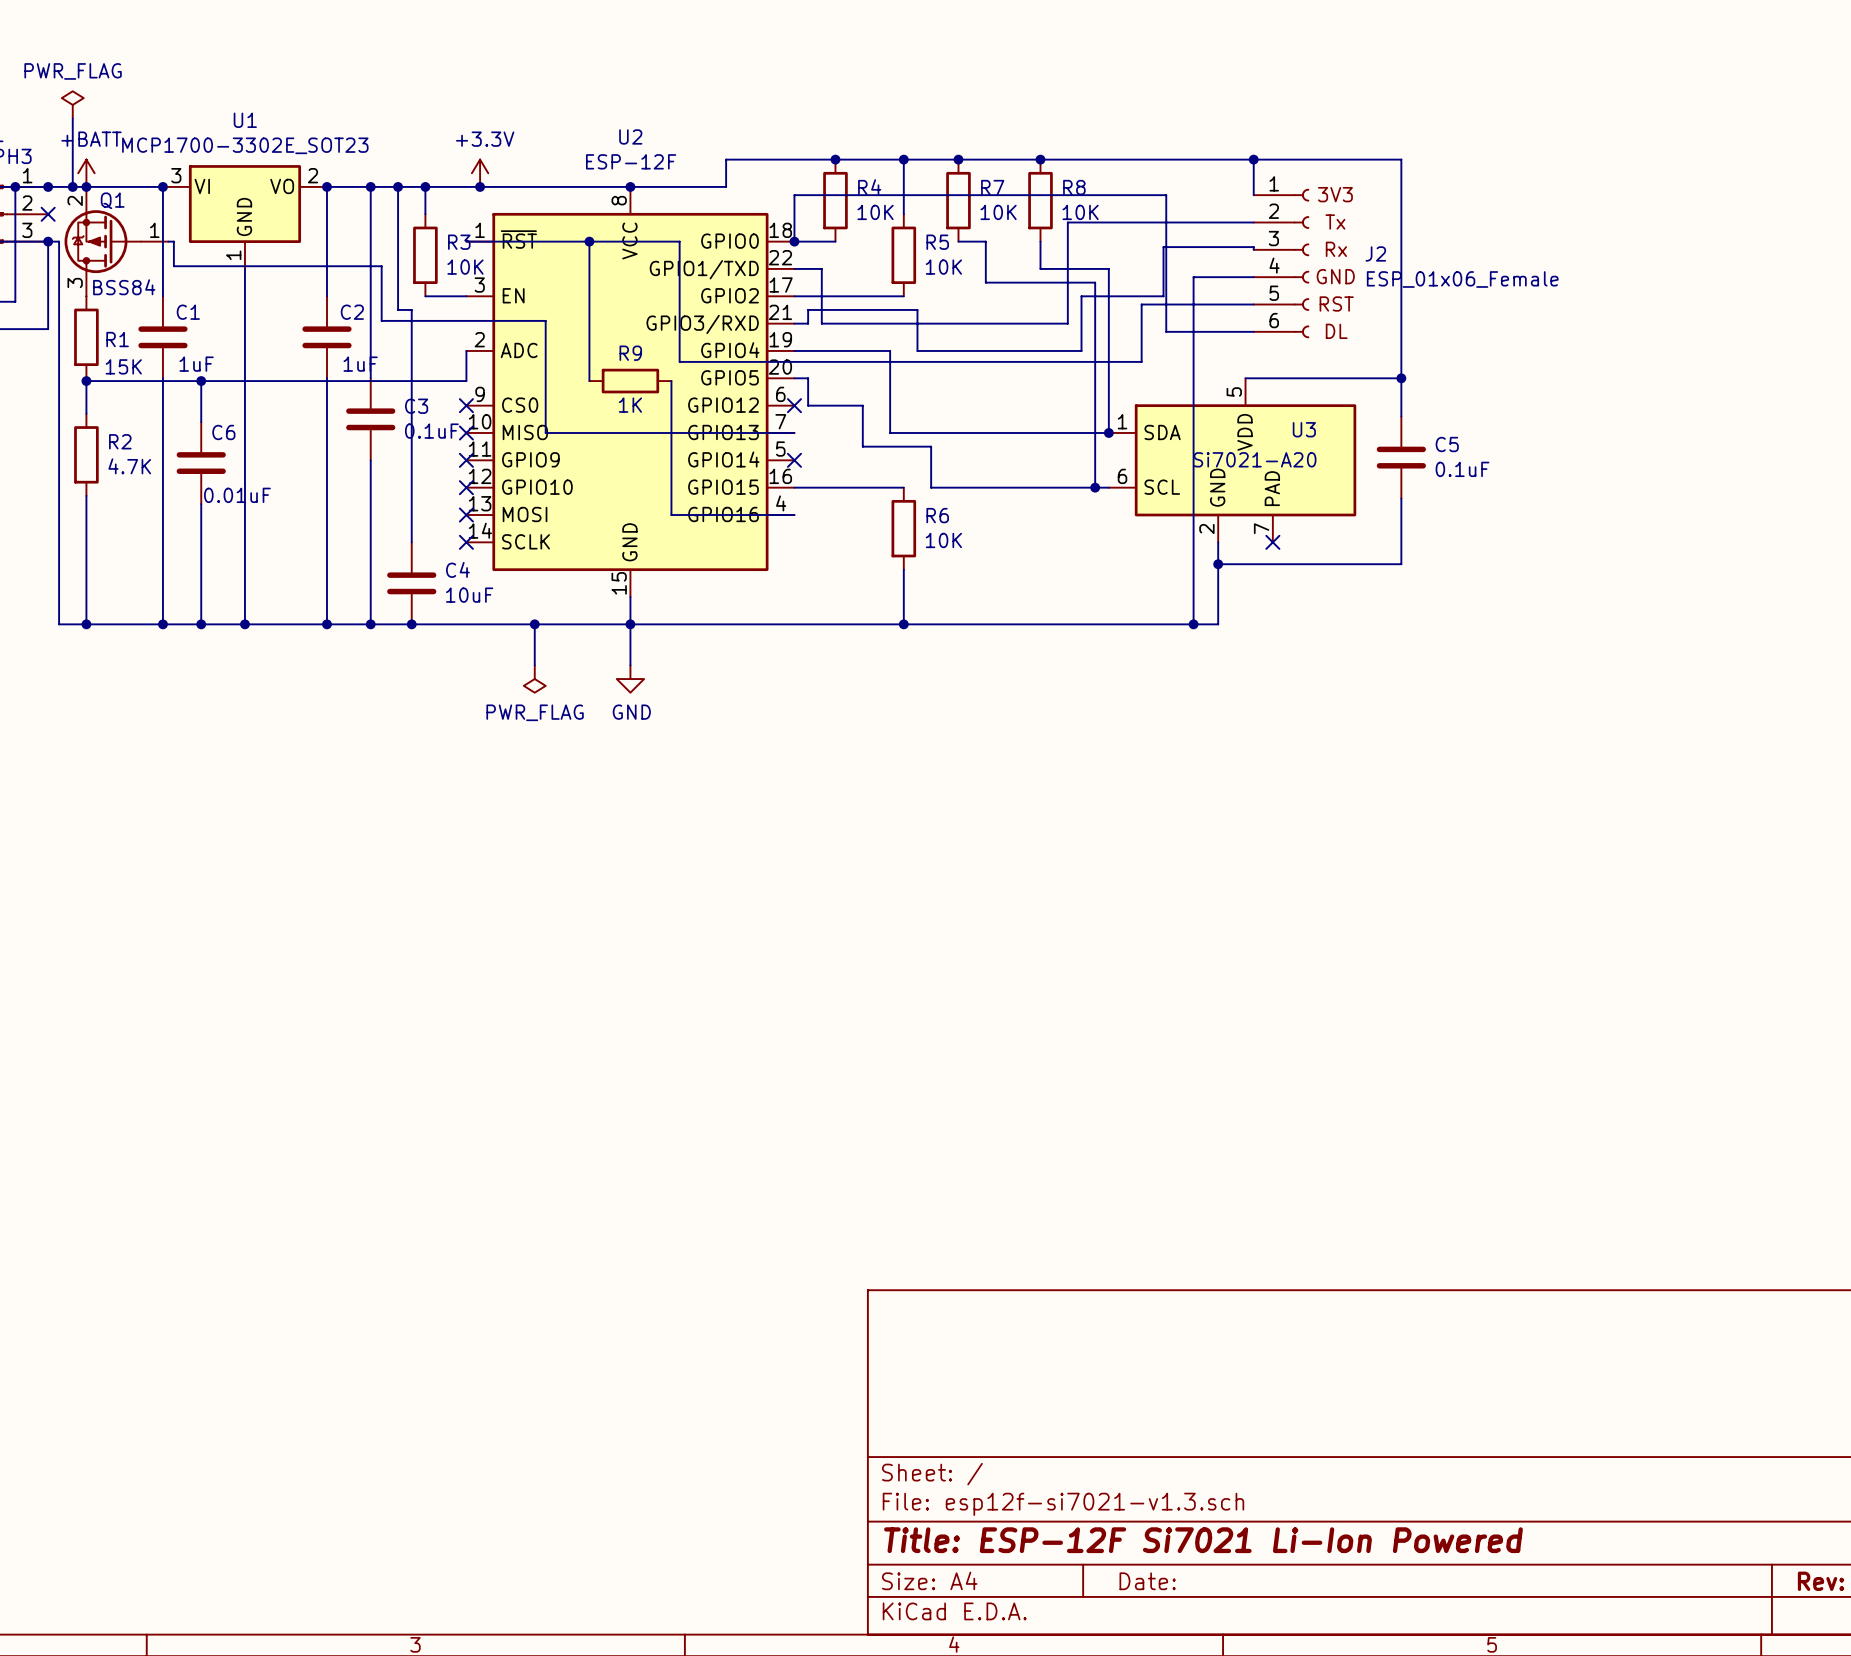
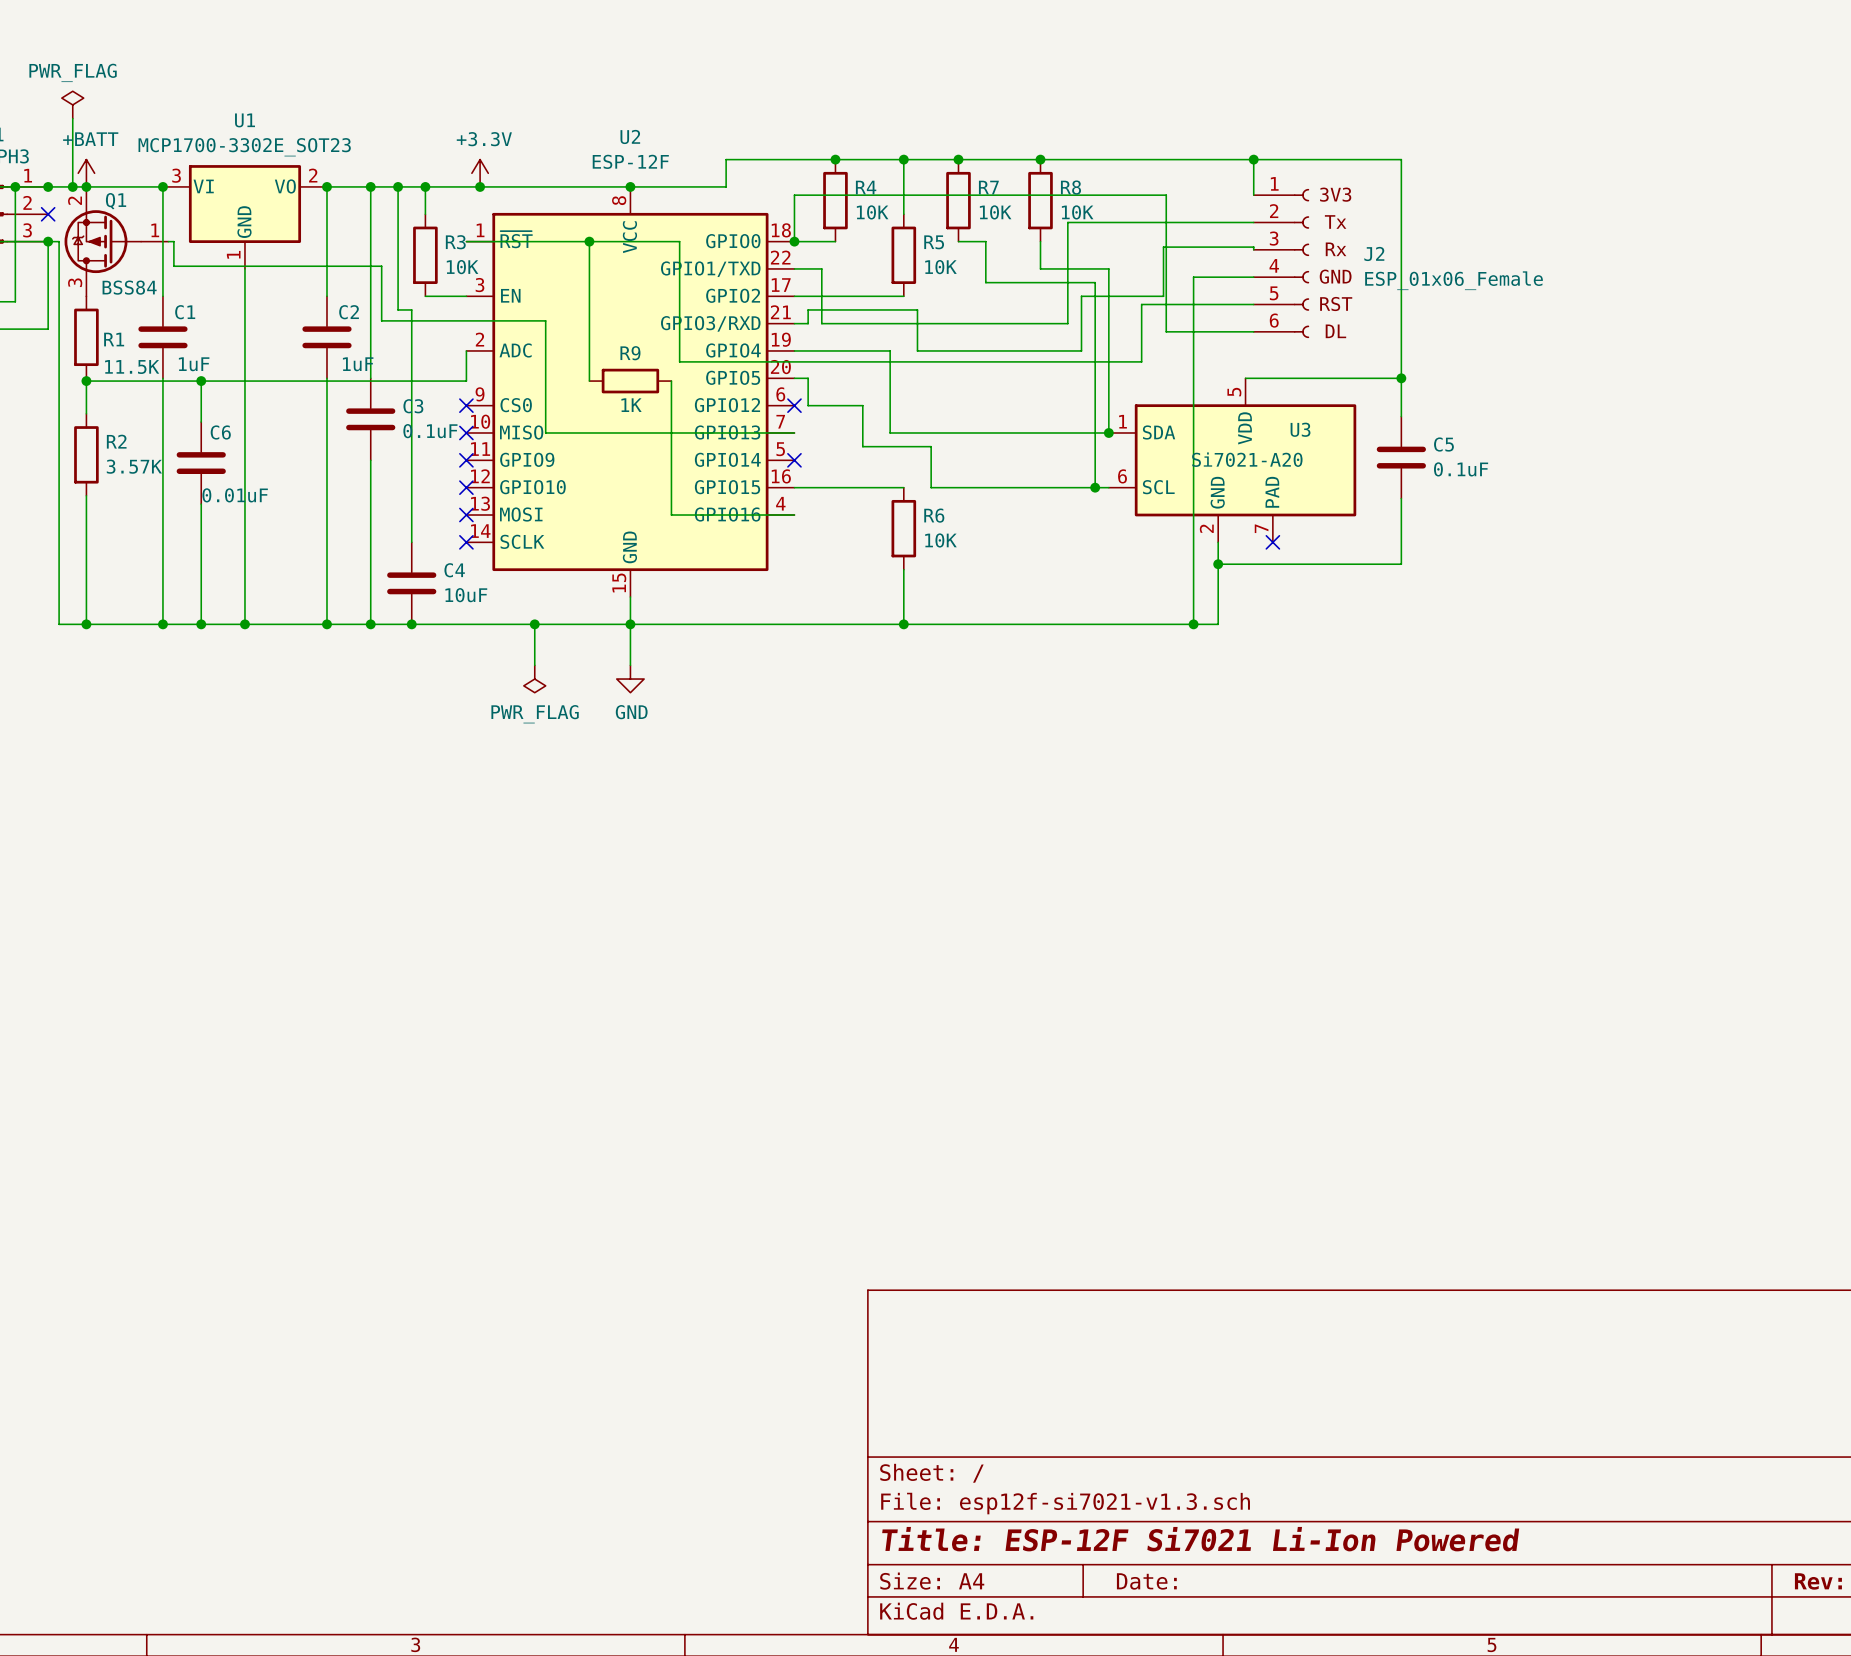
R1 value: 15K (123, 366) -> 11.5K (132, 367)
R2 value: 4.7K (129, 466) -> 3.57K (134, 466)

